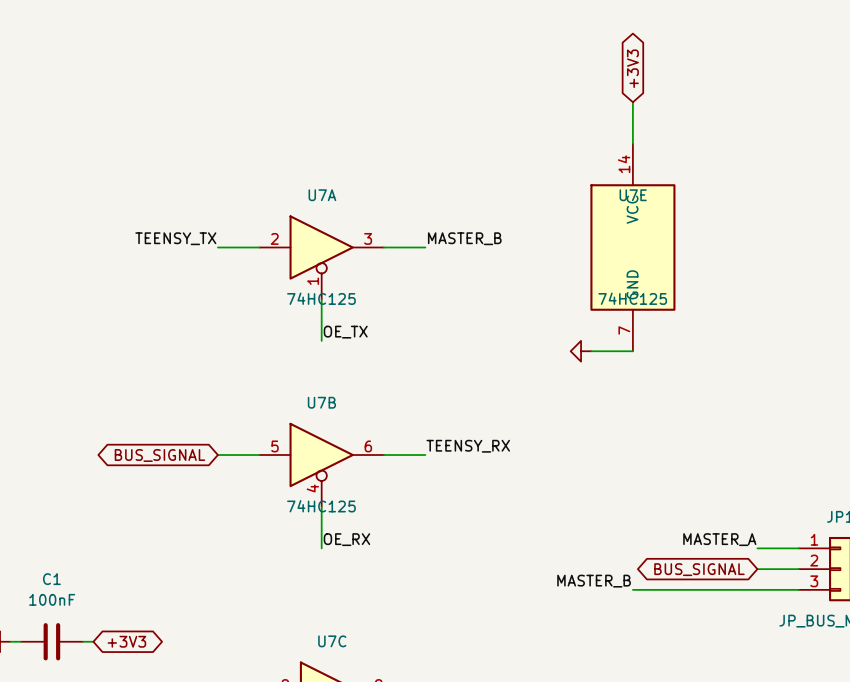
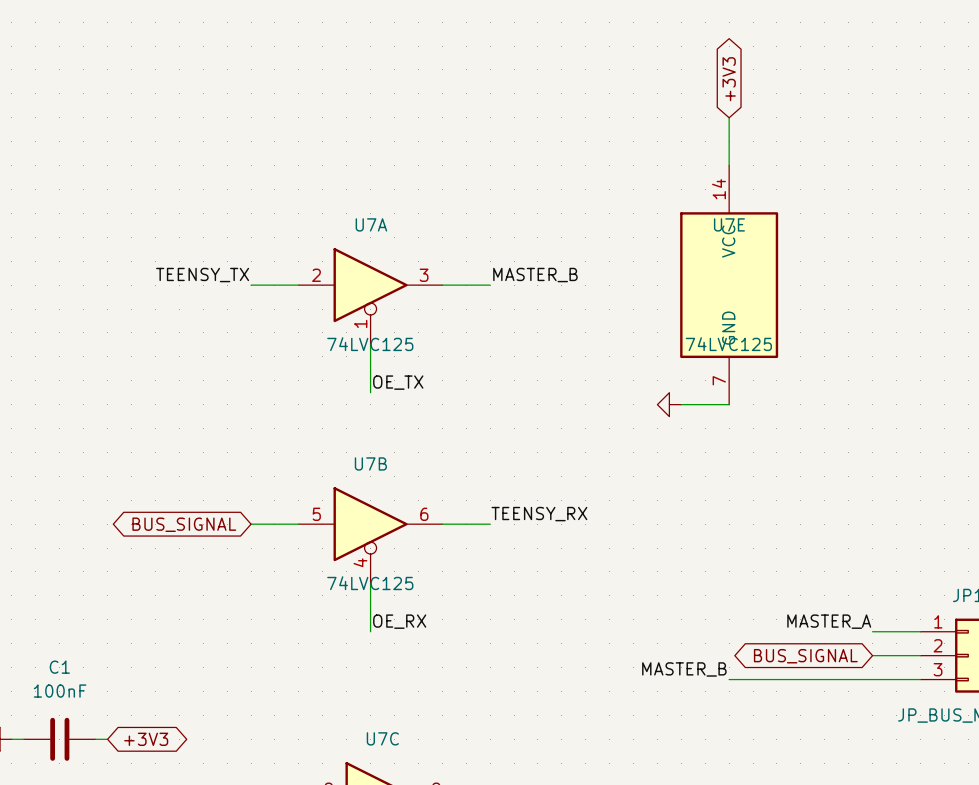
U7A value: 74HC125 (321, 298) -> 74LVC125 (370, 344)
U7E value: 74HC125 (632, 298) -> 74LVC125 (728, 344)
U7B value: 74HC125 (321, 506) -> 74LVC125 (370, 583)

